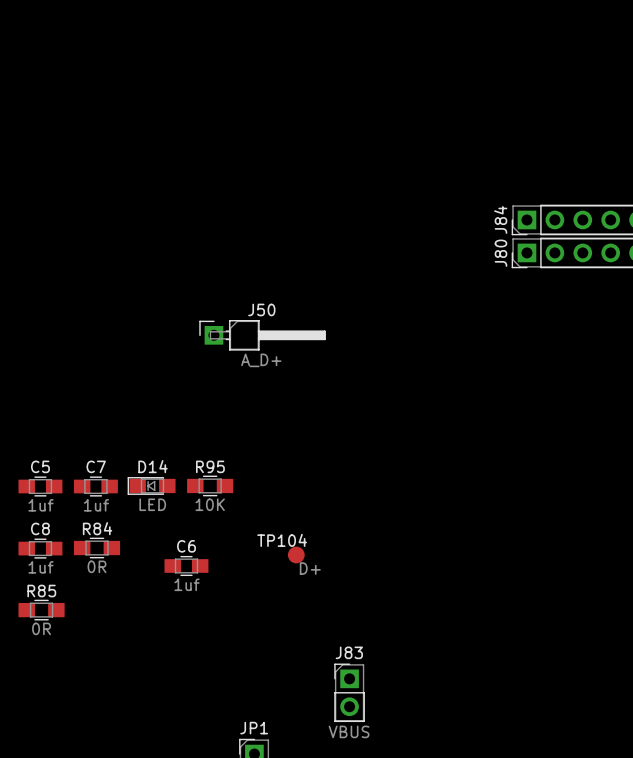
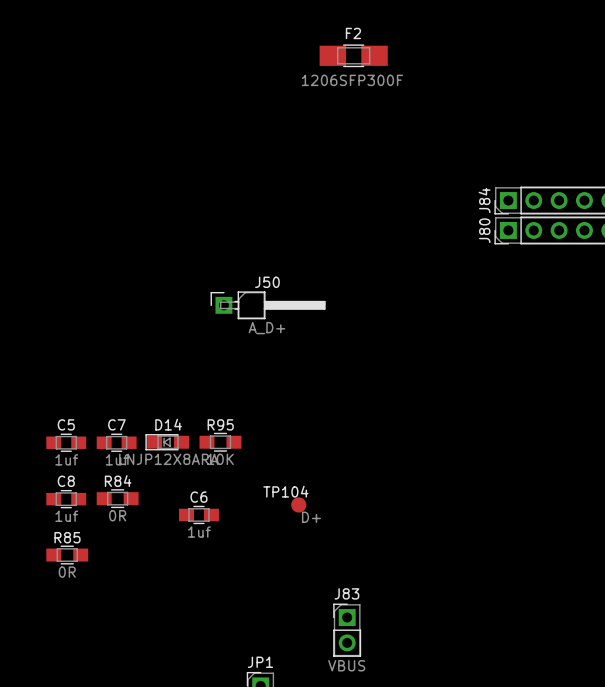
F2: none -> 1206SFP300F (353, 55)
D14 value: LED (152, 504) -> LNJP12X8ARA (168, 459)

